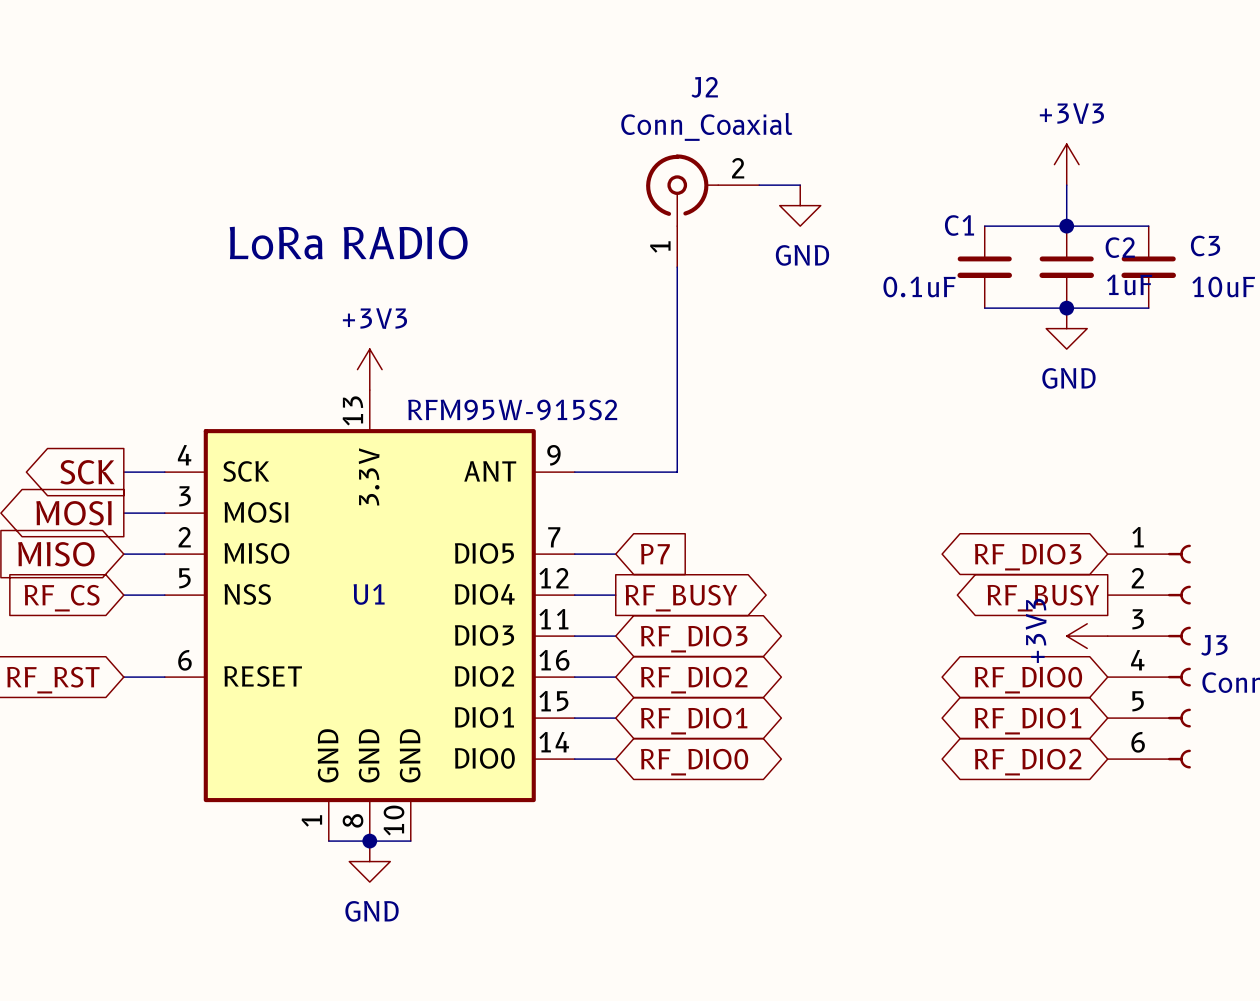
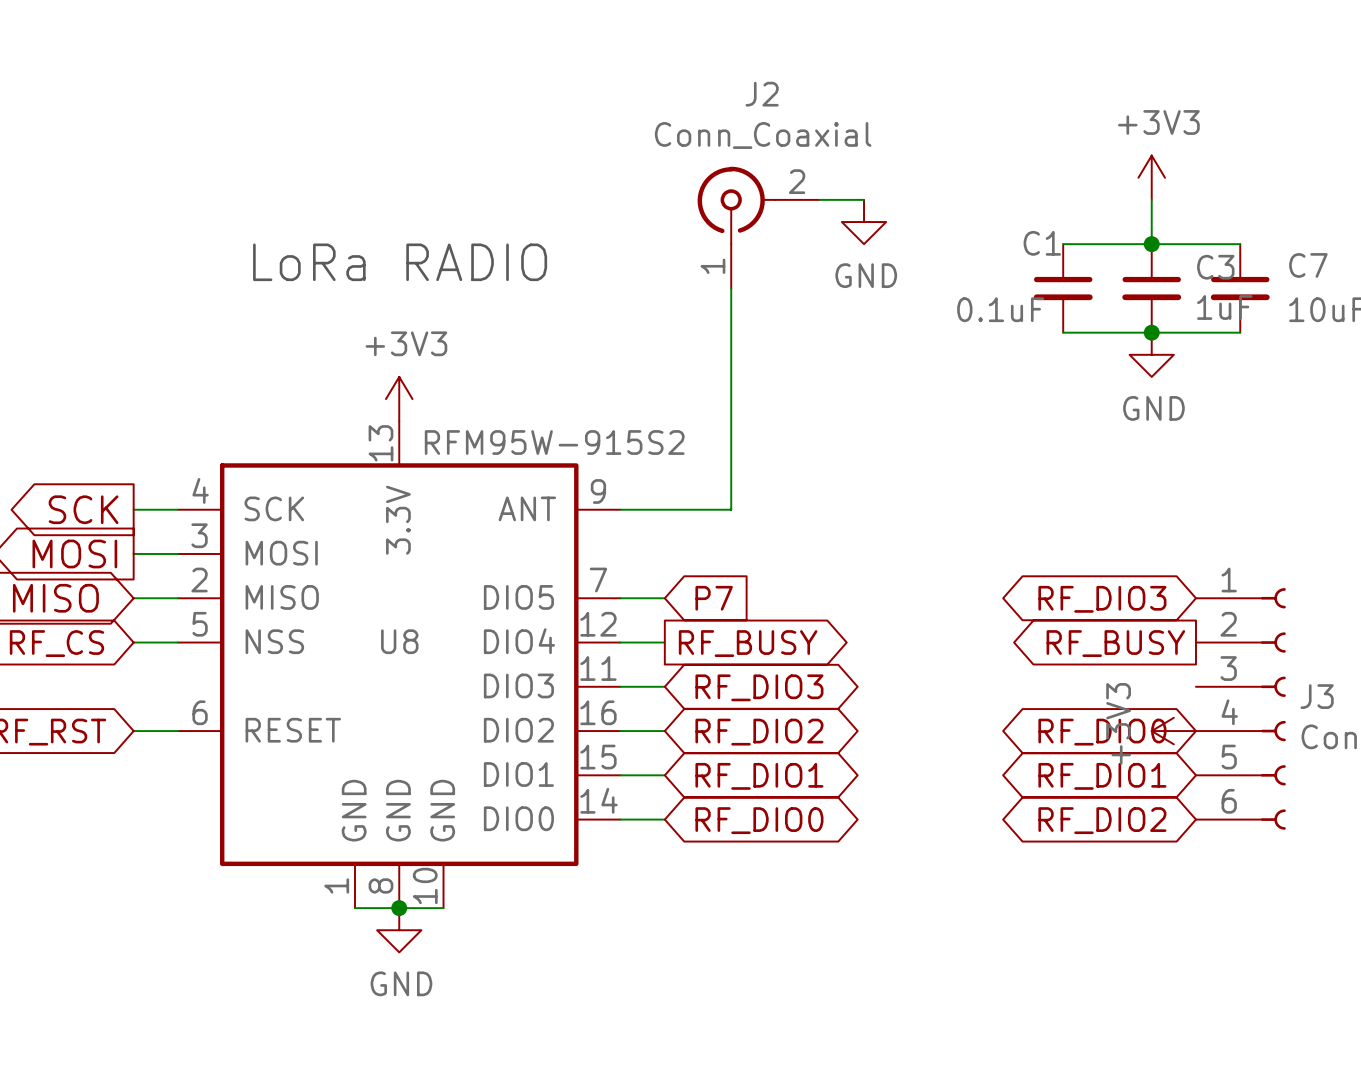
C3 name: C3 (1205, 246) -> C7 (1308, 265)
C2 name: C2 (1120, 247) -> C3 (1215, 267)
U1 name: U1 (369, 594) -> U8 (399, 641)
power symbol position: +3V3 (1087, 636) -> +3V3 (1173, 731)

